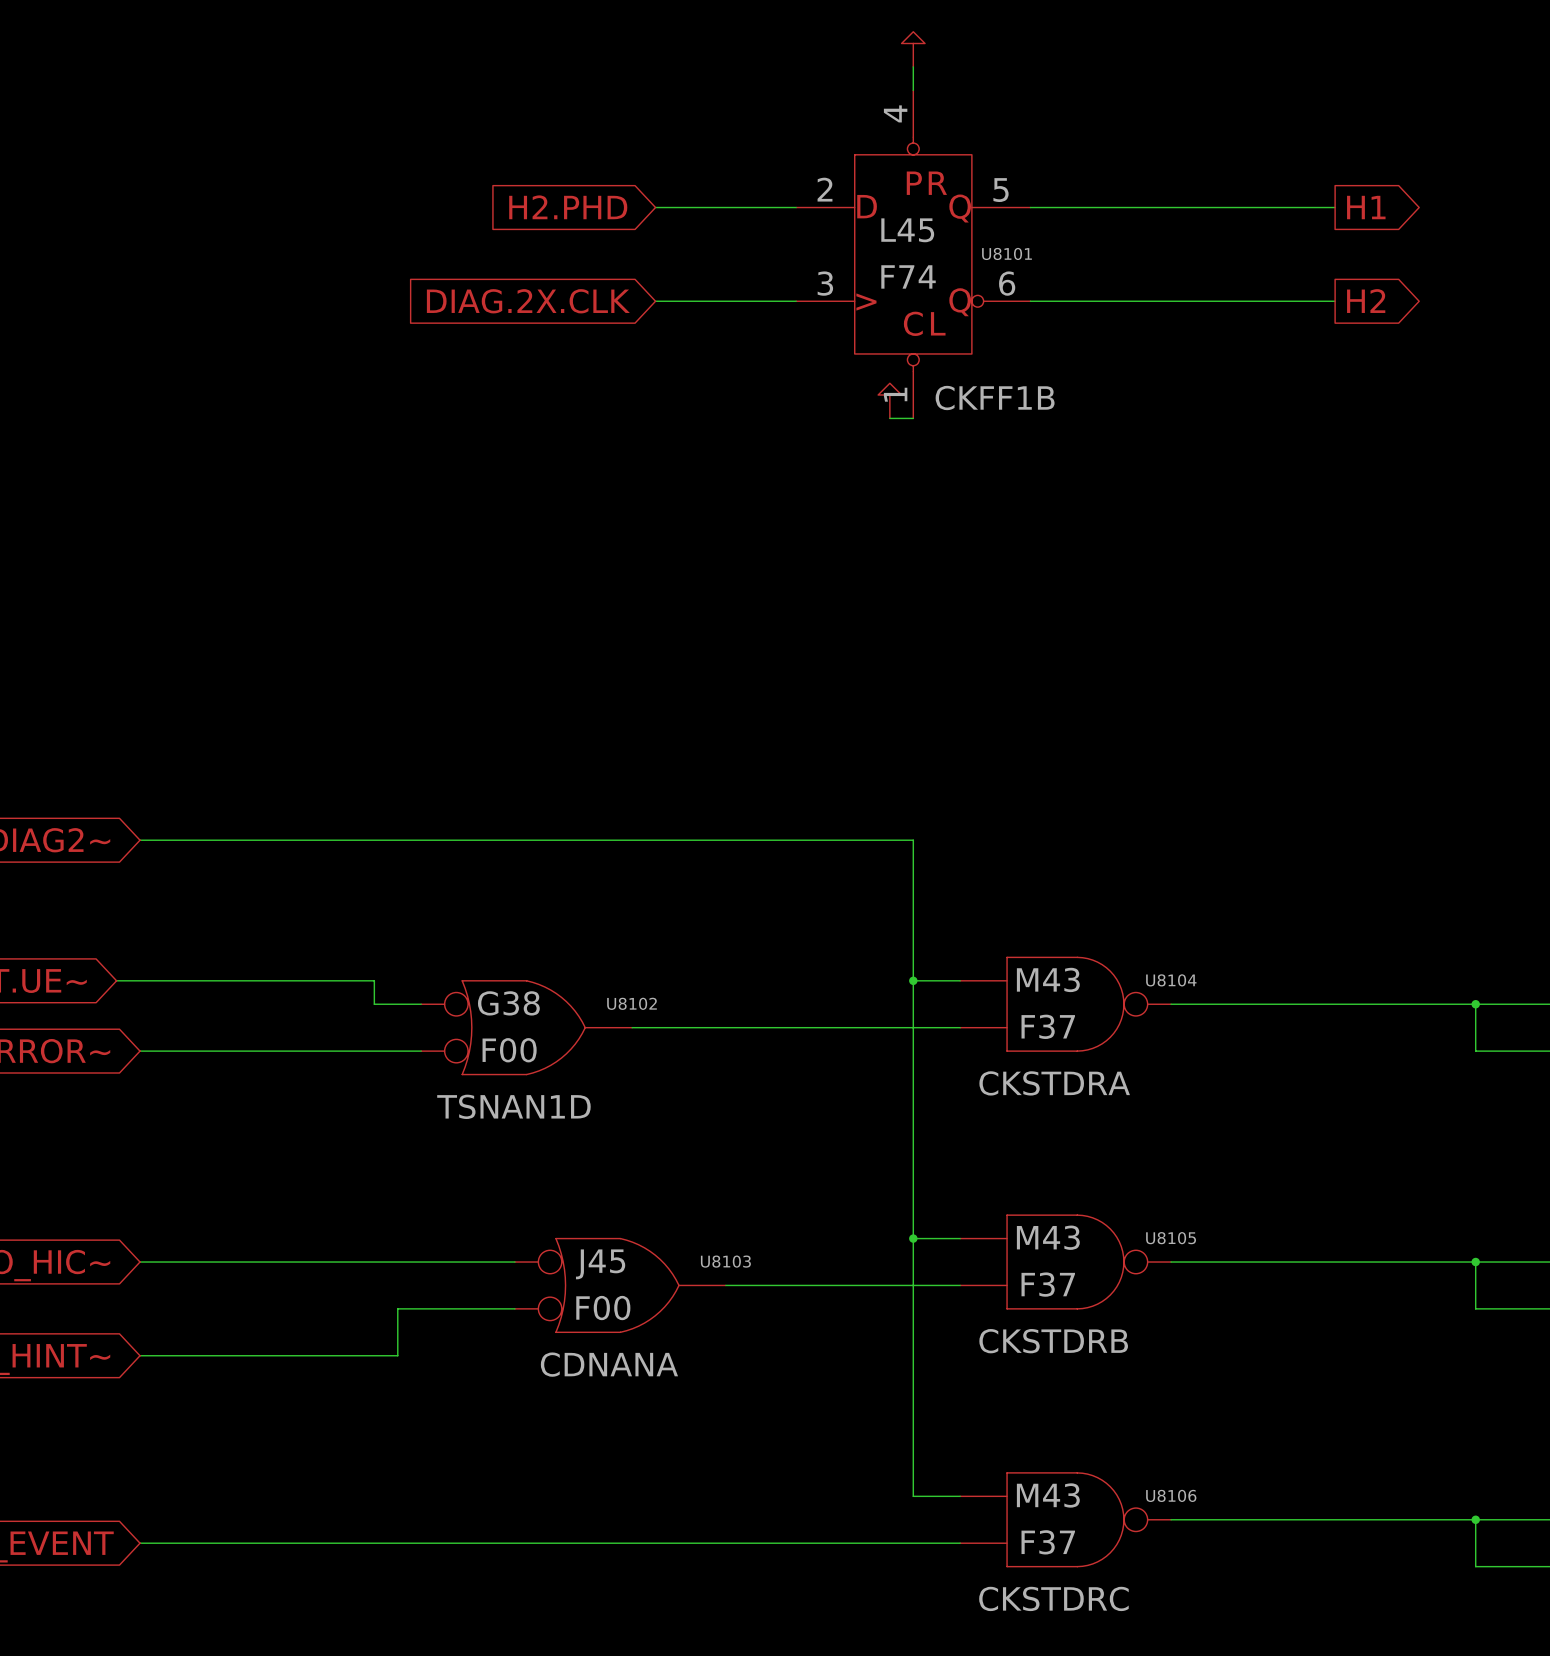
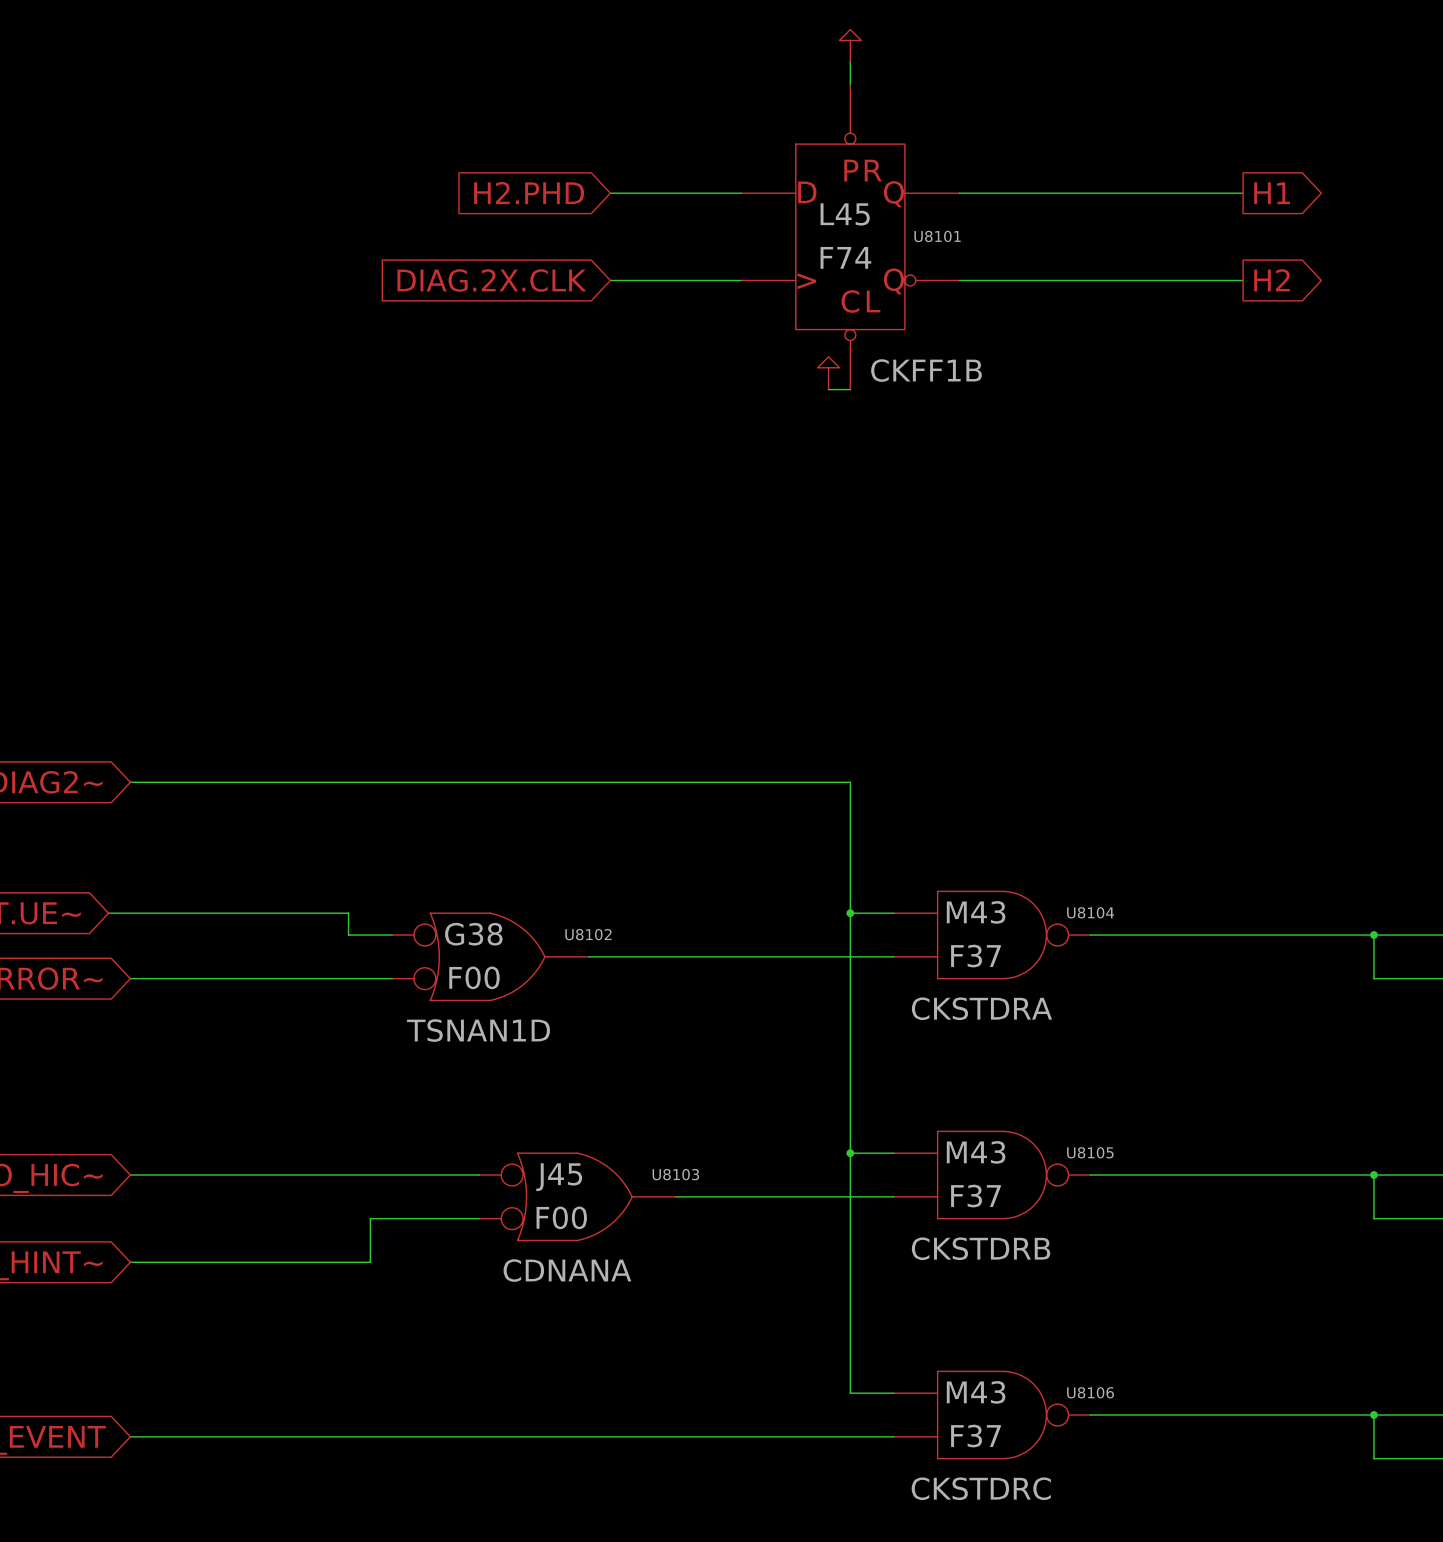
U8101 pin number: 4 (895, 113) -> none
U8101 pin number: 2 (825, 189) -> none
U8101 pin number: 5 (1001, 190) -> none
U8101 pin number: 3 (825, 283) -> none
U8101 pin number: 6 (1007, 283) -> none
U8101 pin number: 1 (895, 394) -> none

